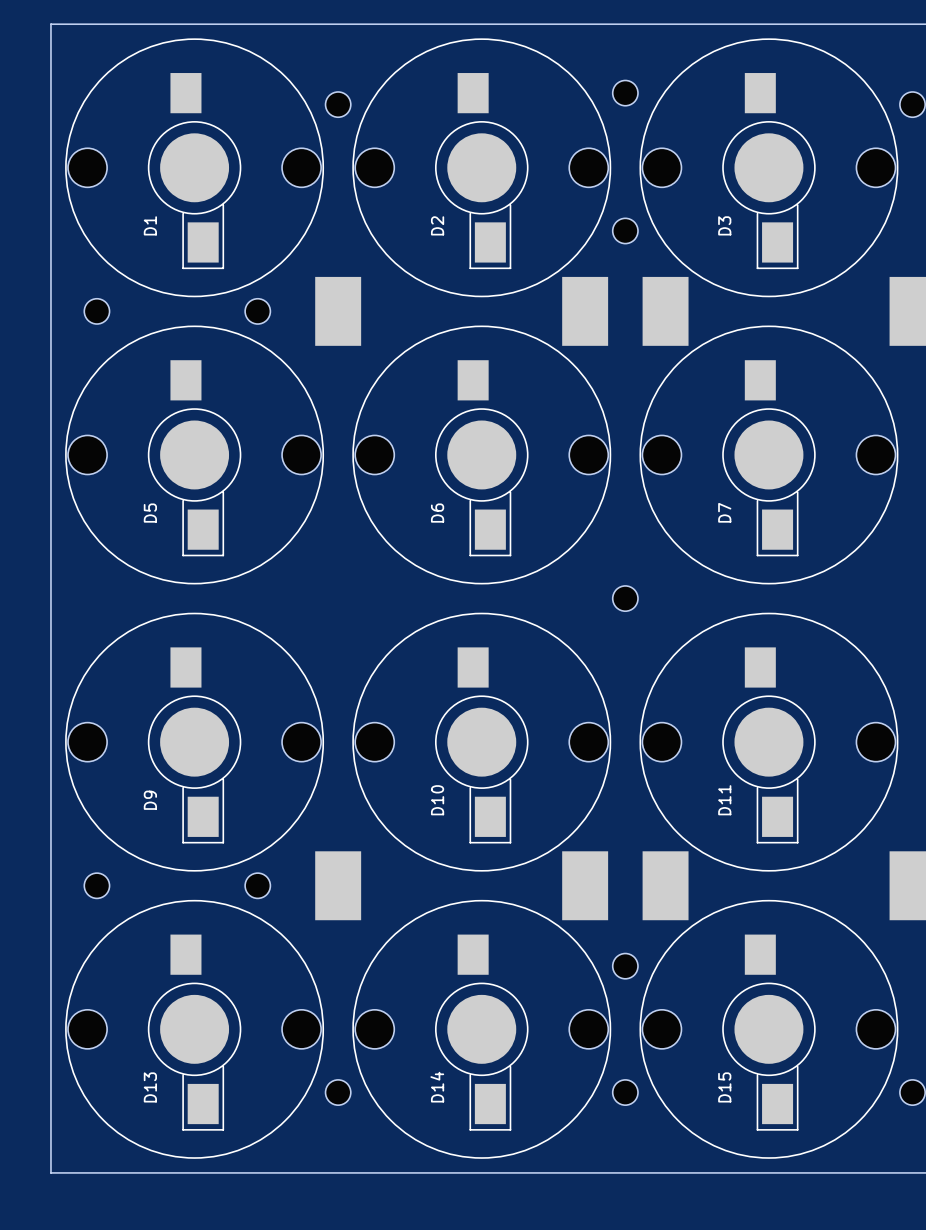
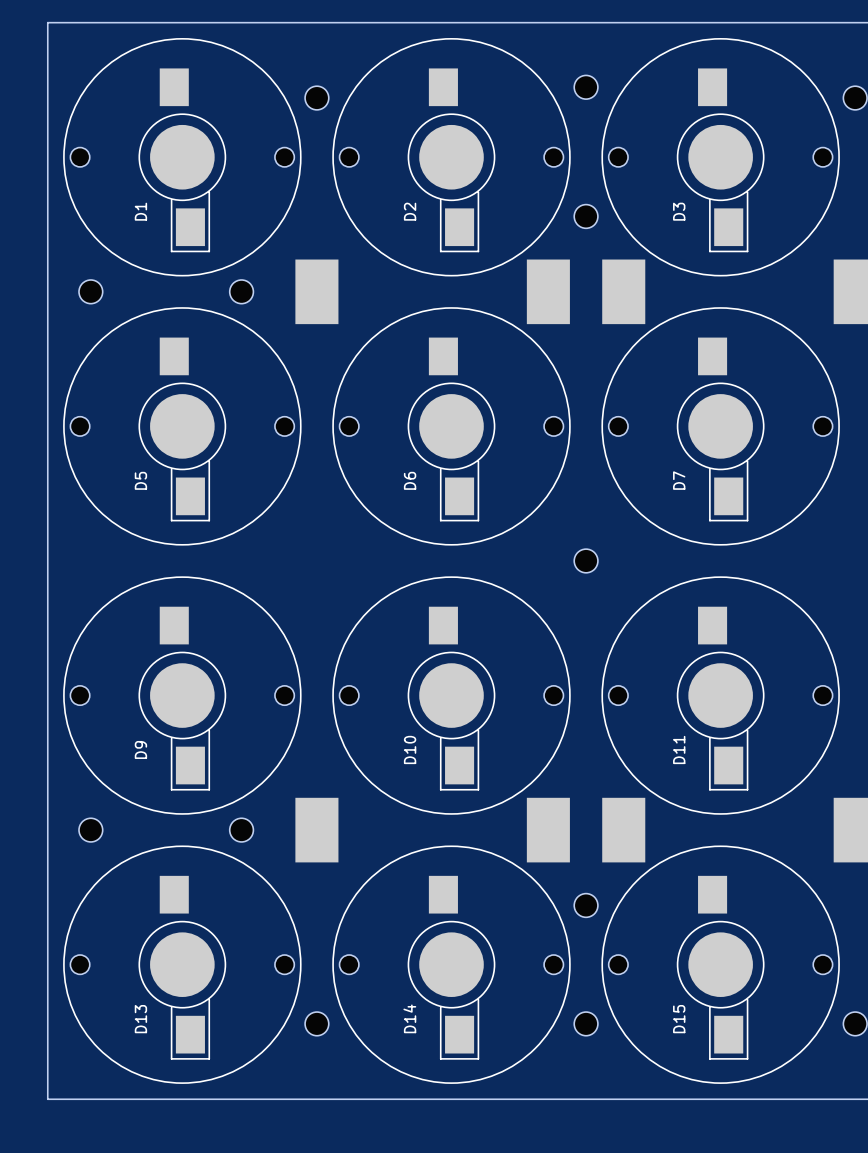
D1 footprint: [65, 38, 324, 298] -> [63, 38, 302, 277]
D2 footprint: [352, 38, 612, 298] -> [332, 38, 571, 277]
D3 footprint: [639, 38, 899, 298] -> [601, 38, 840, 277]
D5 footprint: [65, 325, 324, 585] -> [63, 307, 302, 546]
D6 footprint: [352, 325, 612, 585] -> [332, 307, 571, 546]
D7 footprint: [639, 325, 899, 585] -> [601, 307, 840, 546]
D9 footprint: [65, 612, 324, 872] -> [63, 576, 302, 815]
D10 footprint: [352, 612, 612, 872] -> [332, 576, 571, 815]
D11 footprint: [639, 612, 899, 872] -> [601, 576, 840, 815]
D13 footprint: [65, 900, 324, 1159] -> [63, 845, 302, 1084]
D14 footprint: [352, 900, 612, 1159] -> [332, 845, 571, 1084]
D15 footprint: [639, 900, 899, 1159] -> [601, 845, 840, 1084]

